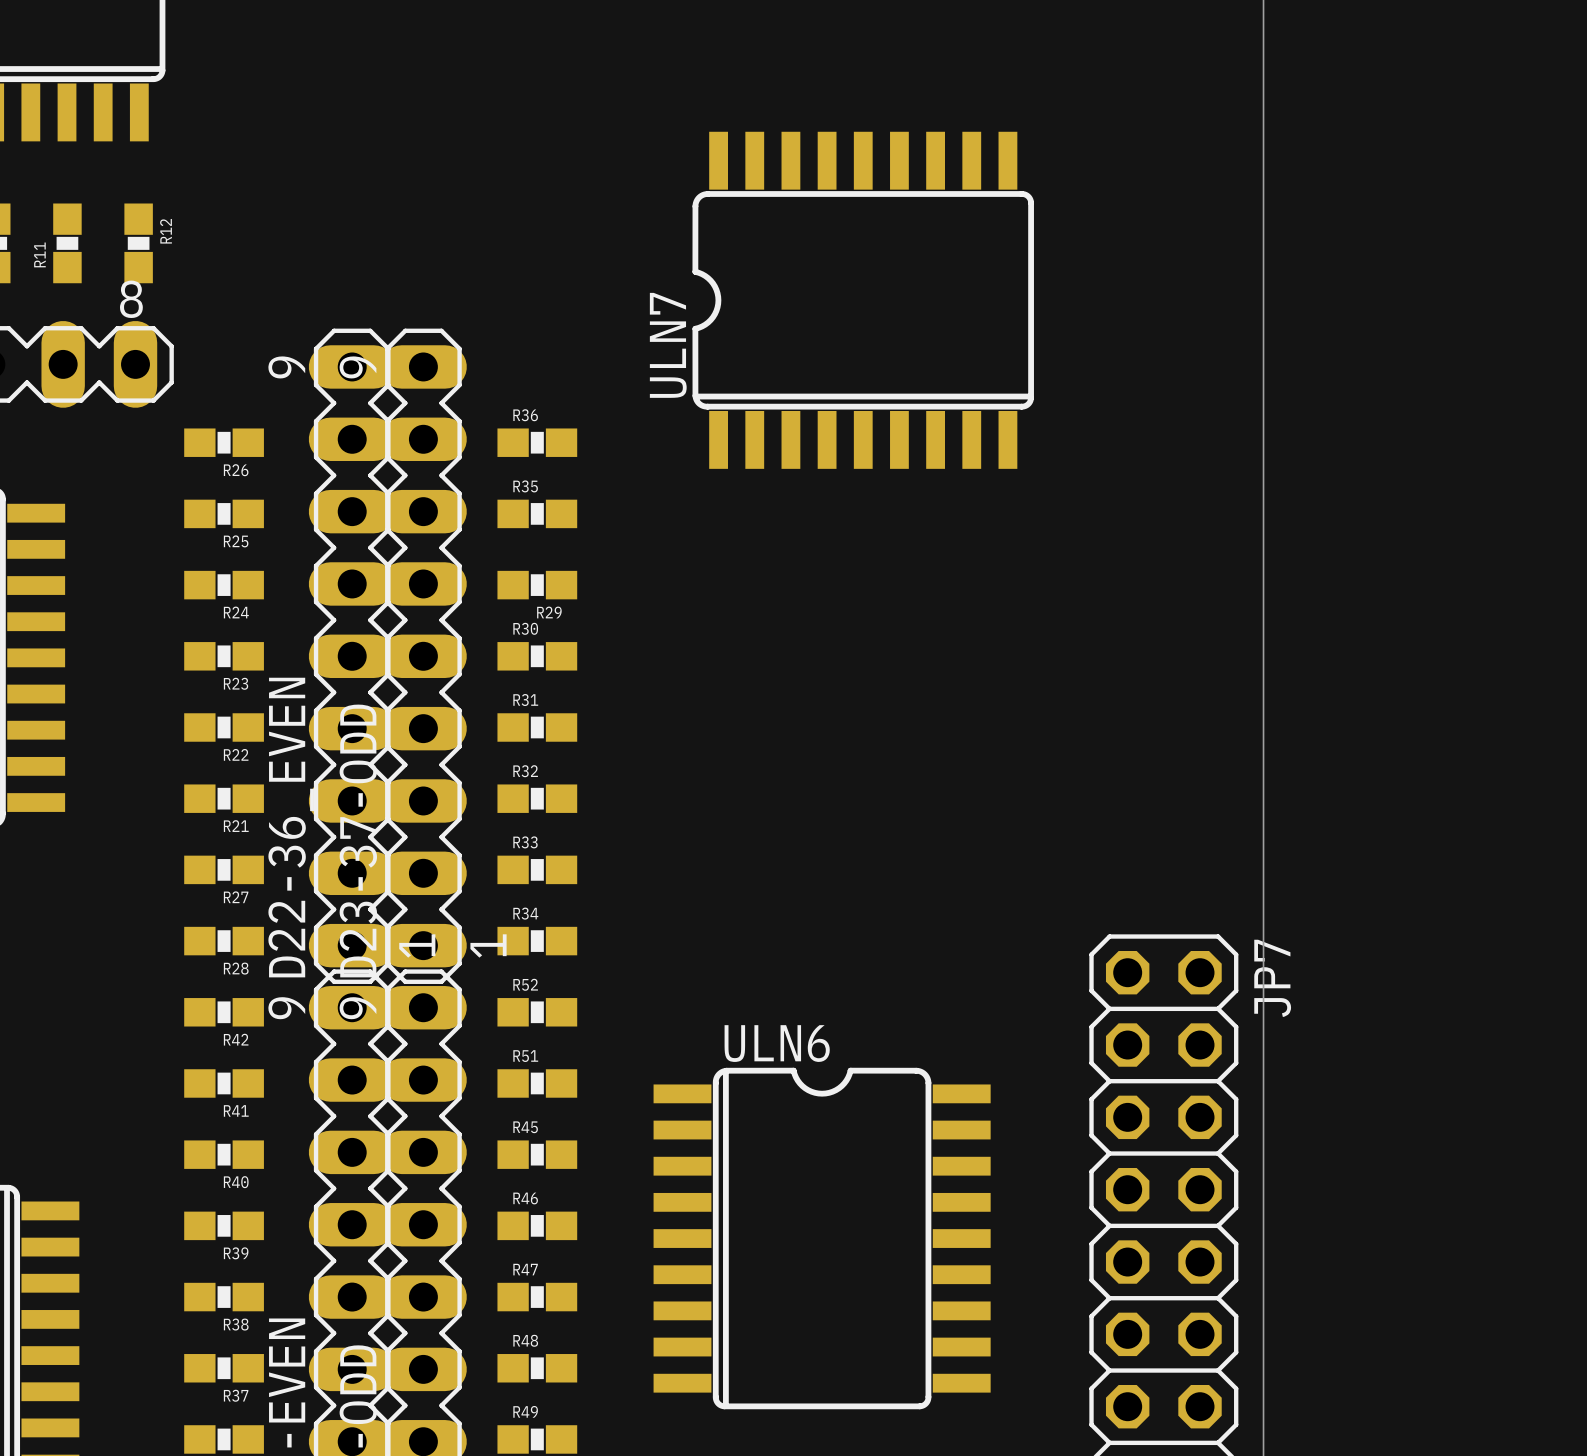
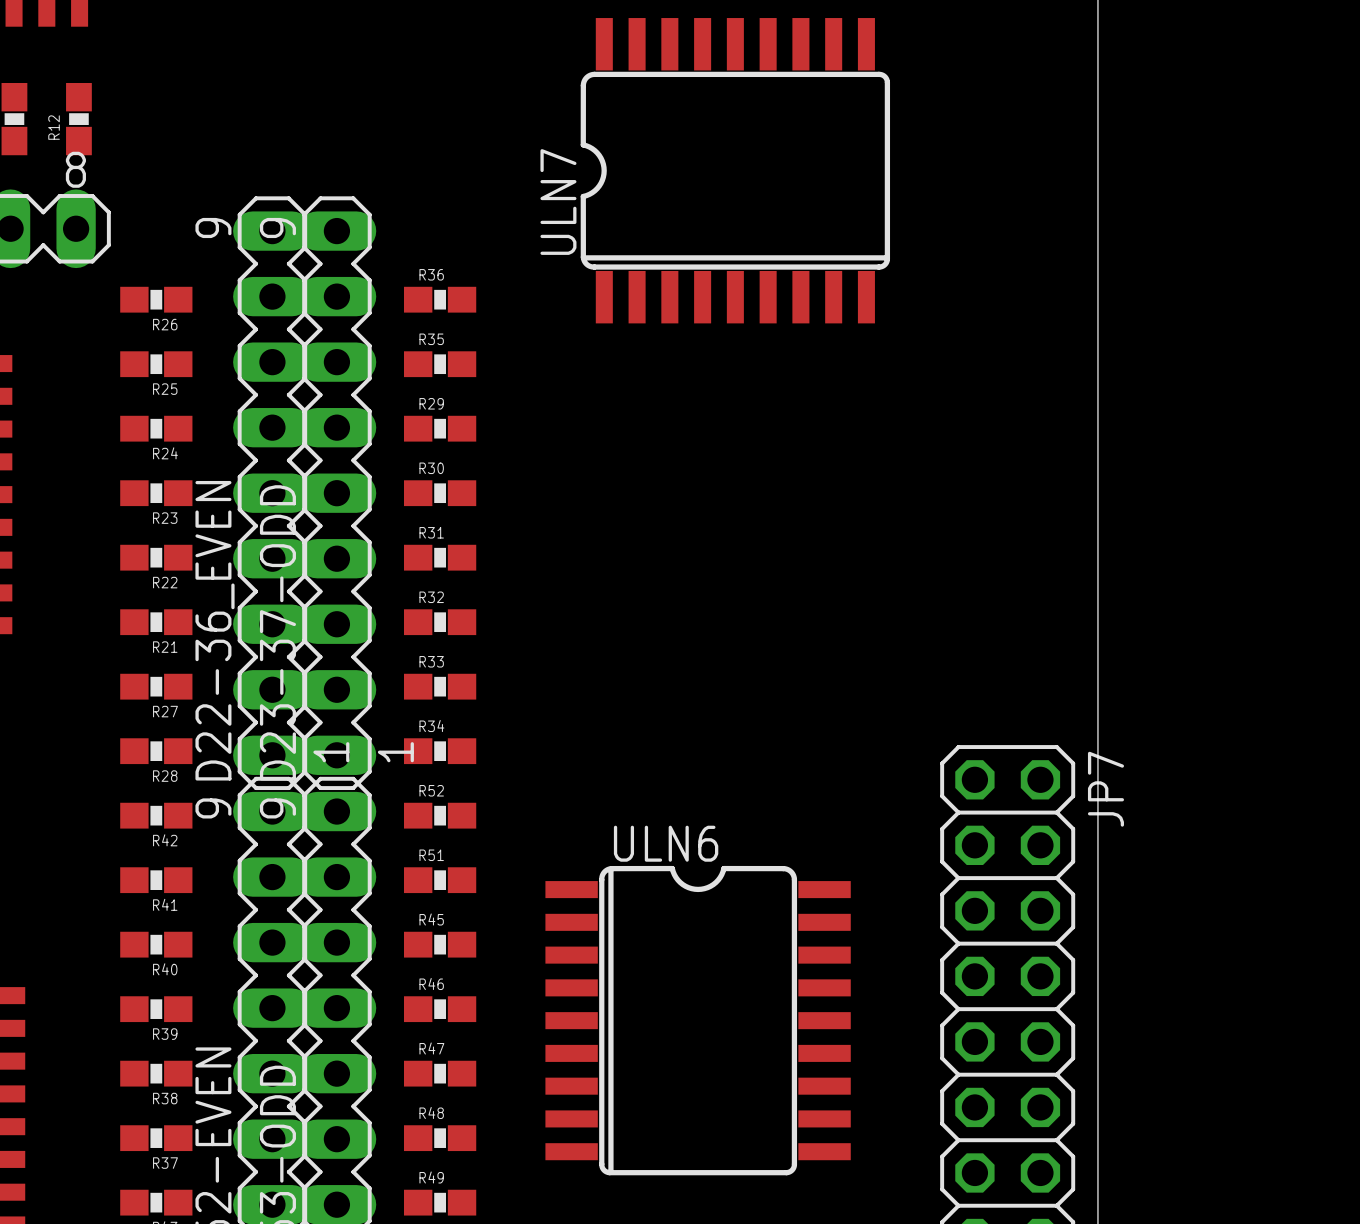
R12 name position: R12 (166, 231) -> R12 (54, 127)
R29 name position: R29 (549, 612) -> R29 (431, 403)

